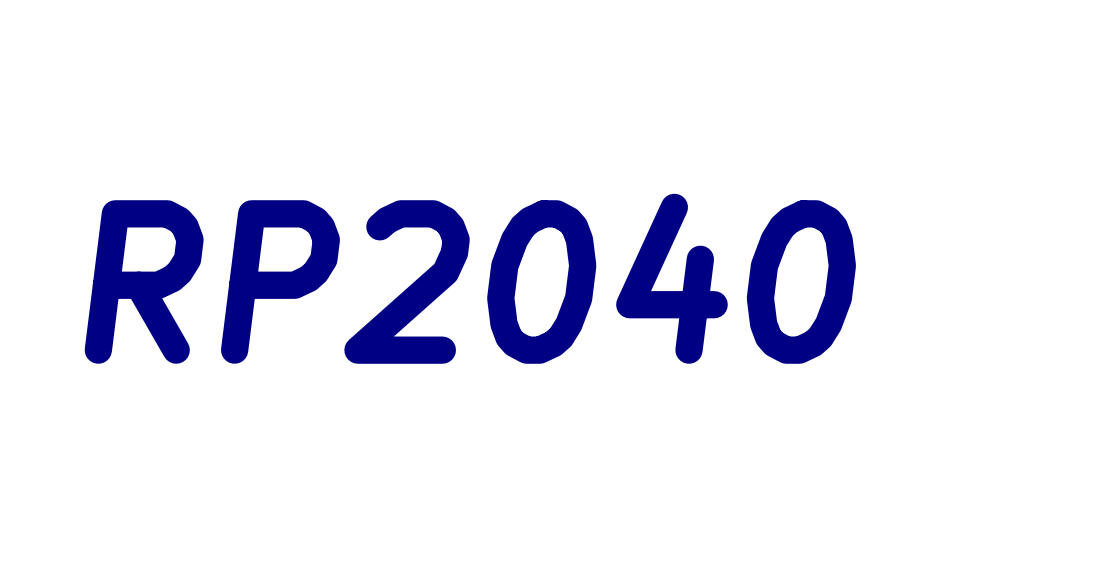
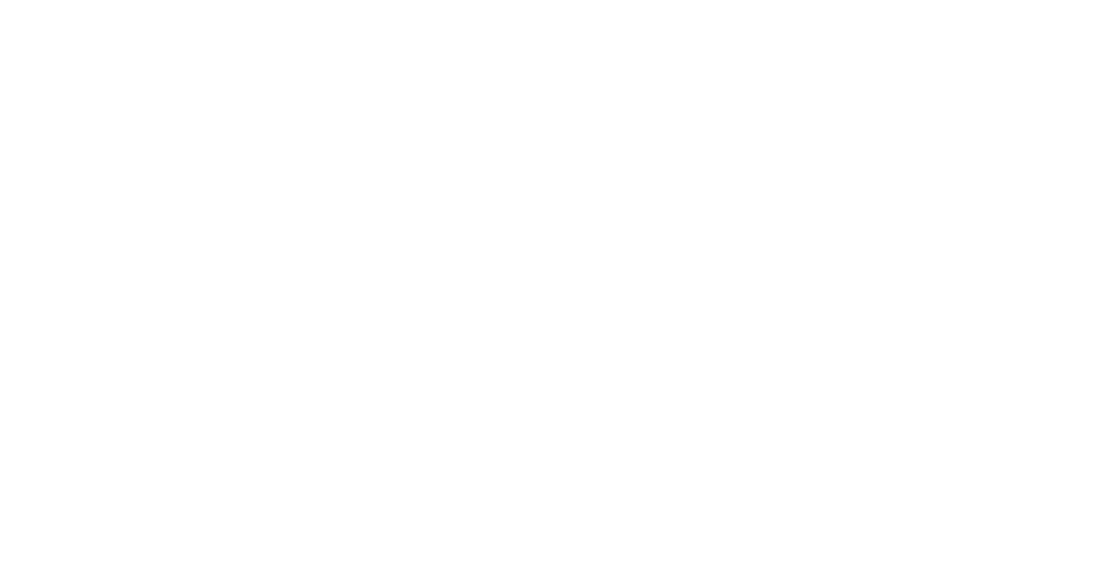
text: RP2040 (470, 278) -> none

